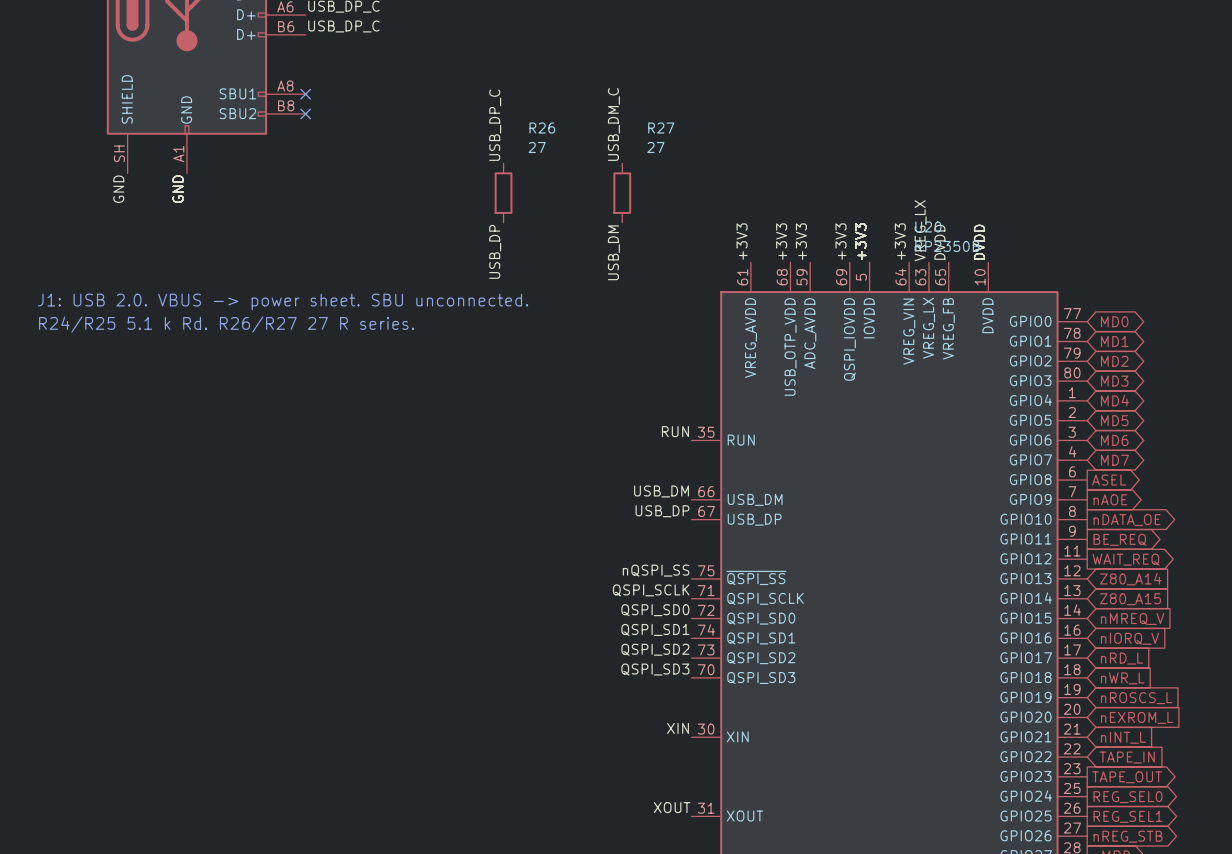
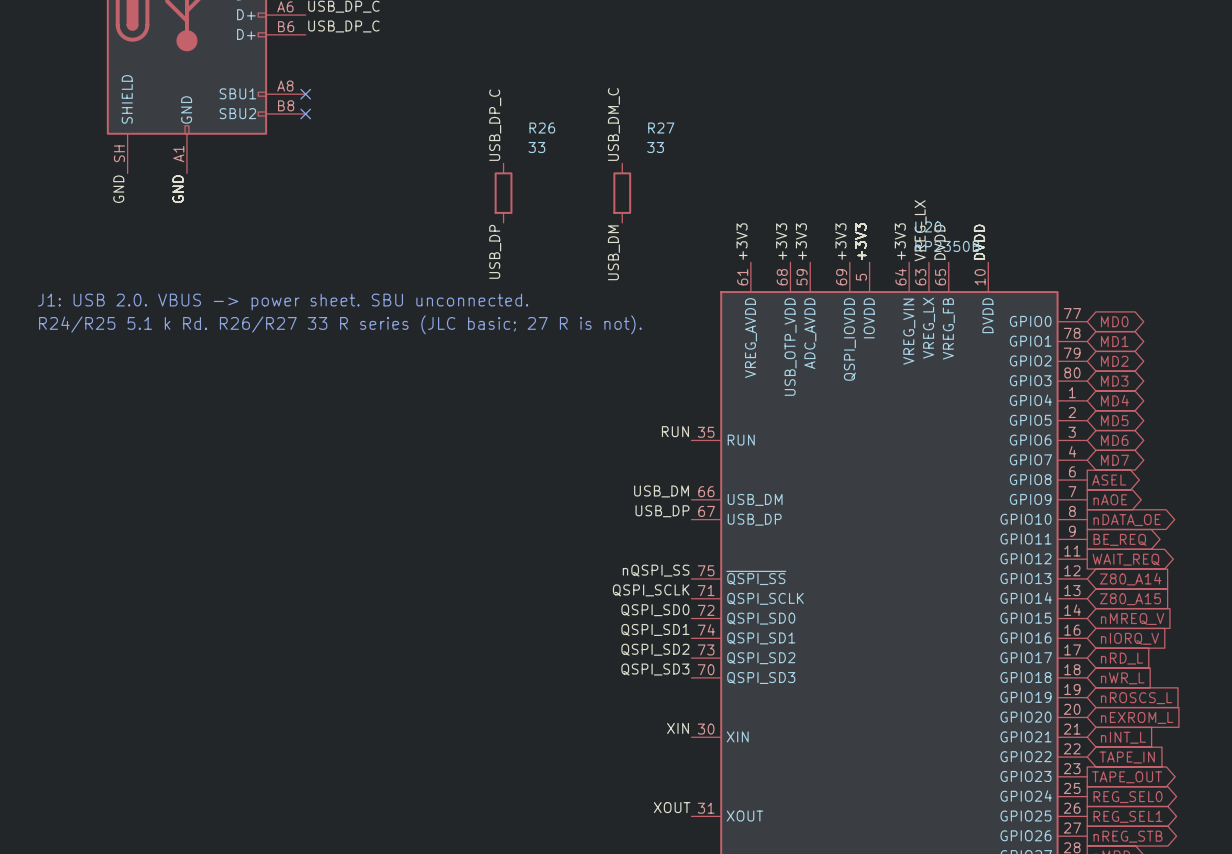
R26 value: 27 (537, 147) -> 33 (536, 147)
R27 value: 27 (655, 147) -> 33 (655, 147)
text: R24/R25 5.1 k Rd. R26/R27 27 R series. (226, 324) -> R24/R25 5.1 k Rd. R26/R27 33 R series (JLC basic; 27 R is not). (340, 324)

